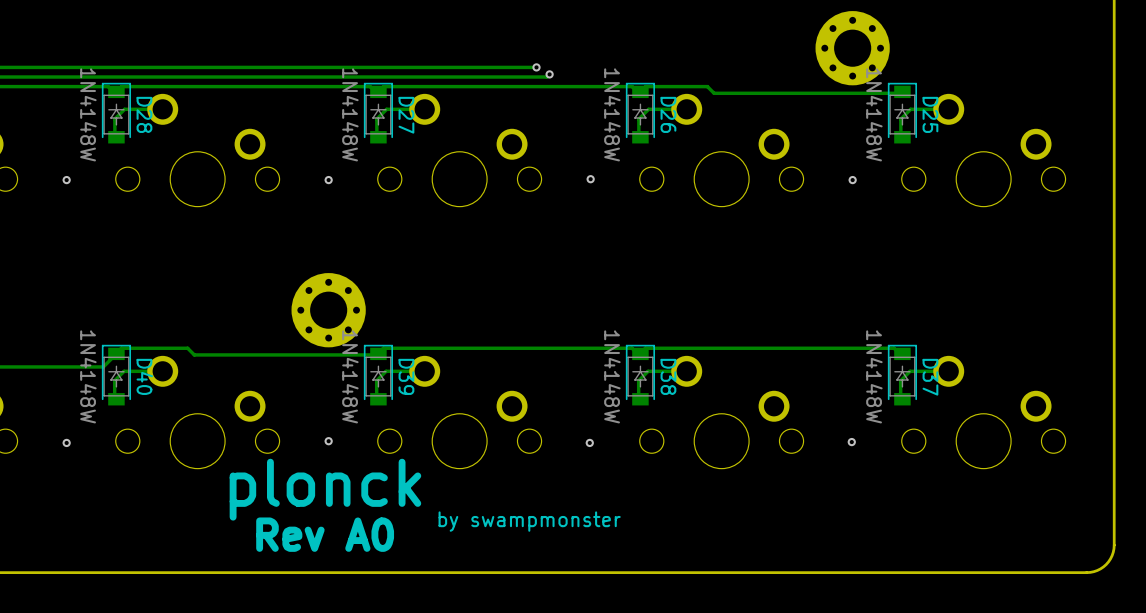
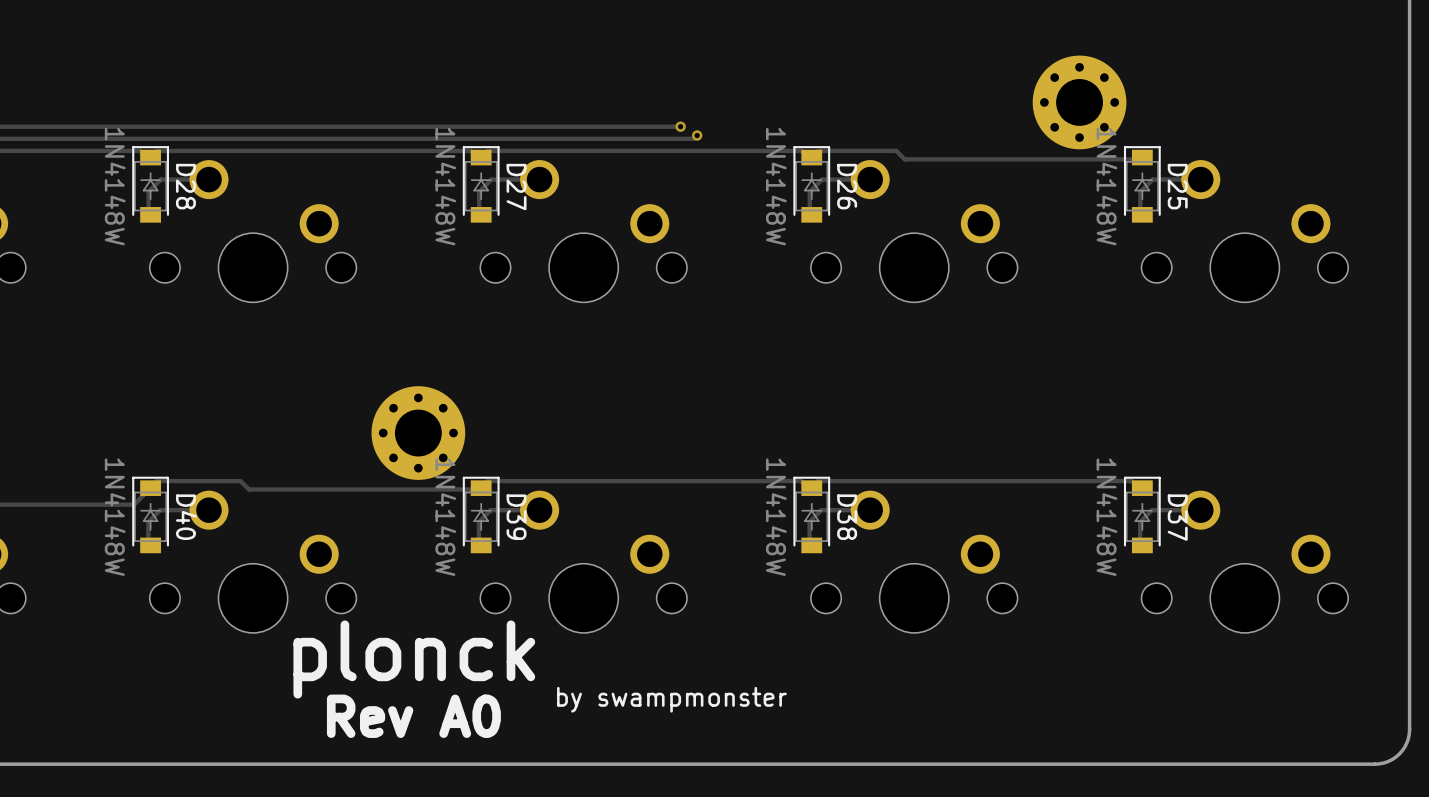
via: (590, 179) -> none
via: (66, 180) -> none
via: (328, 180) -> none
via: (852, 180) -> none
via: (328, 441) -> none
via: (66, 442) -> none
via: (589, 442) -> none
via: (851, 442) -> none

